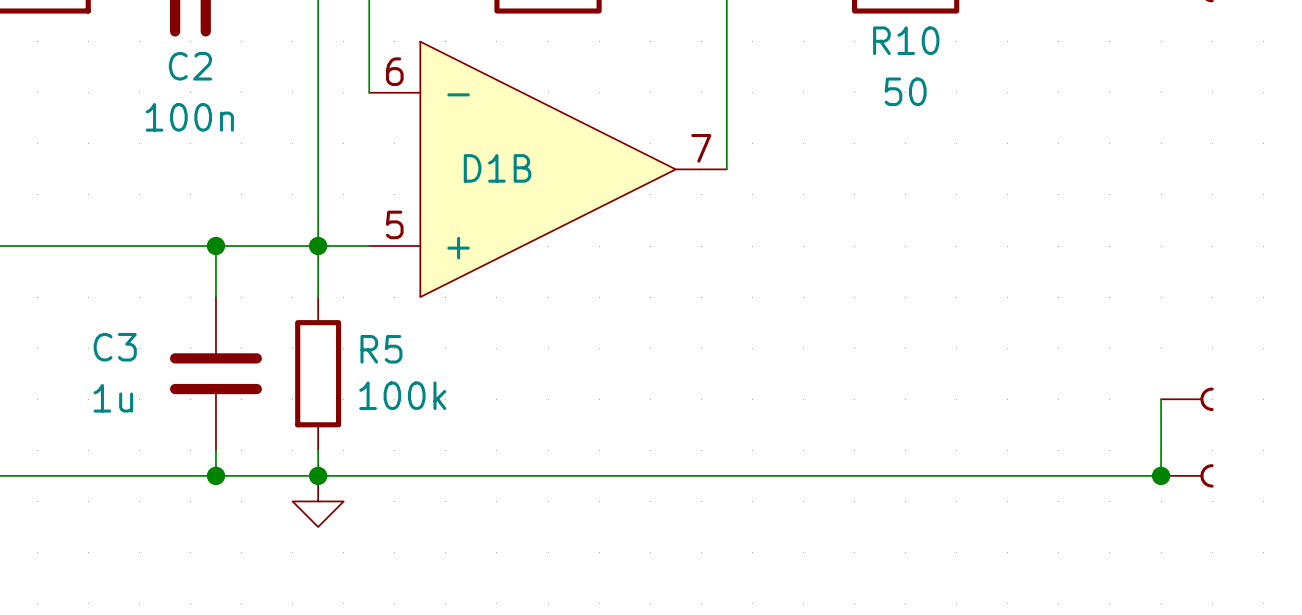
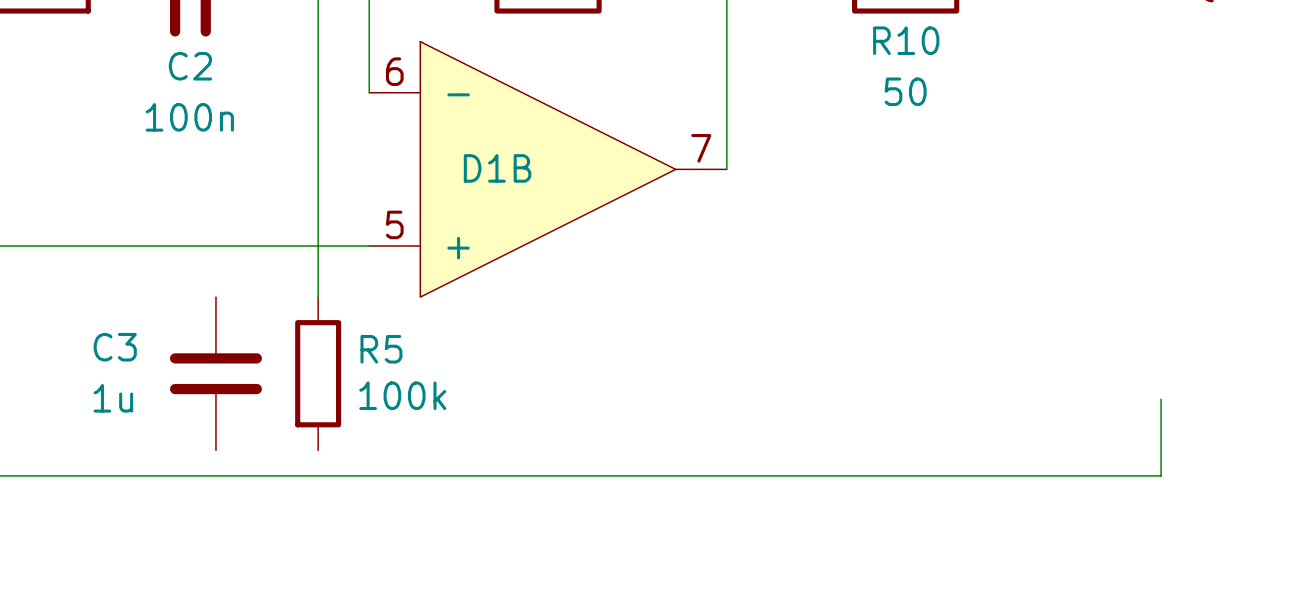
wire: (215, 246) (215, 297) -> none
junction: (215, 246) -> none
junction: (318, 246) -> none
part: (1187, 399) -> none
wire: (215, 450) (215, 475) -> none
wire: (318, 450) (318, 475) -> none
junction: (215, 475) -> none
junction: (318, 475) -> none
junction: (1161, 475) -> none
part: (1187, 475) -> none
power symbol: (318, 501) -> none

